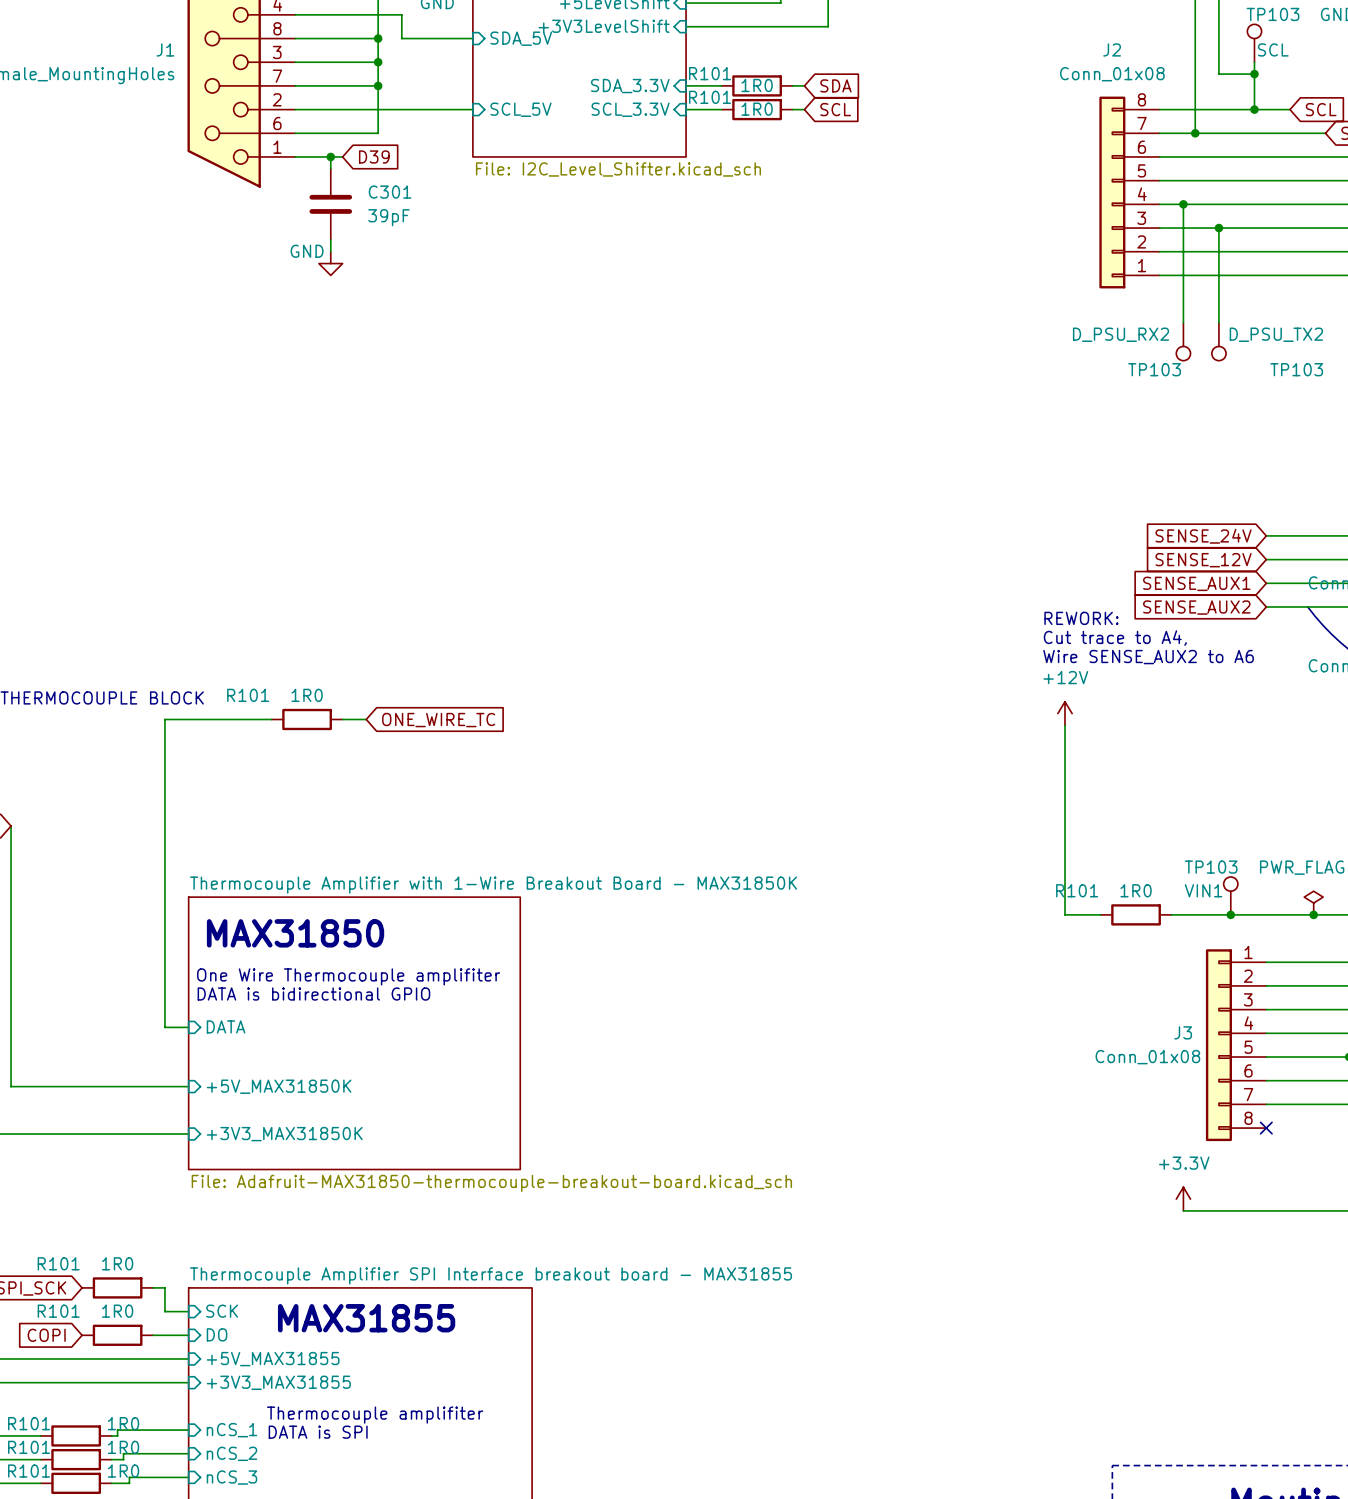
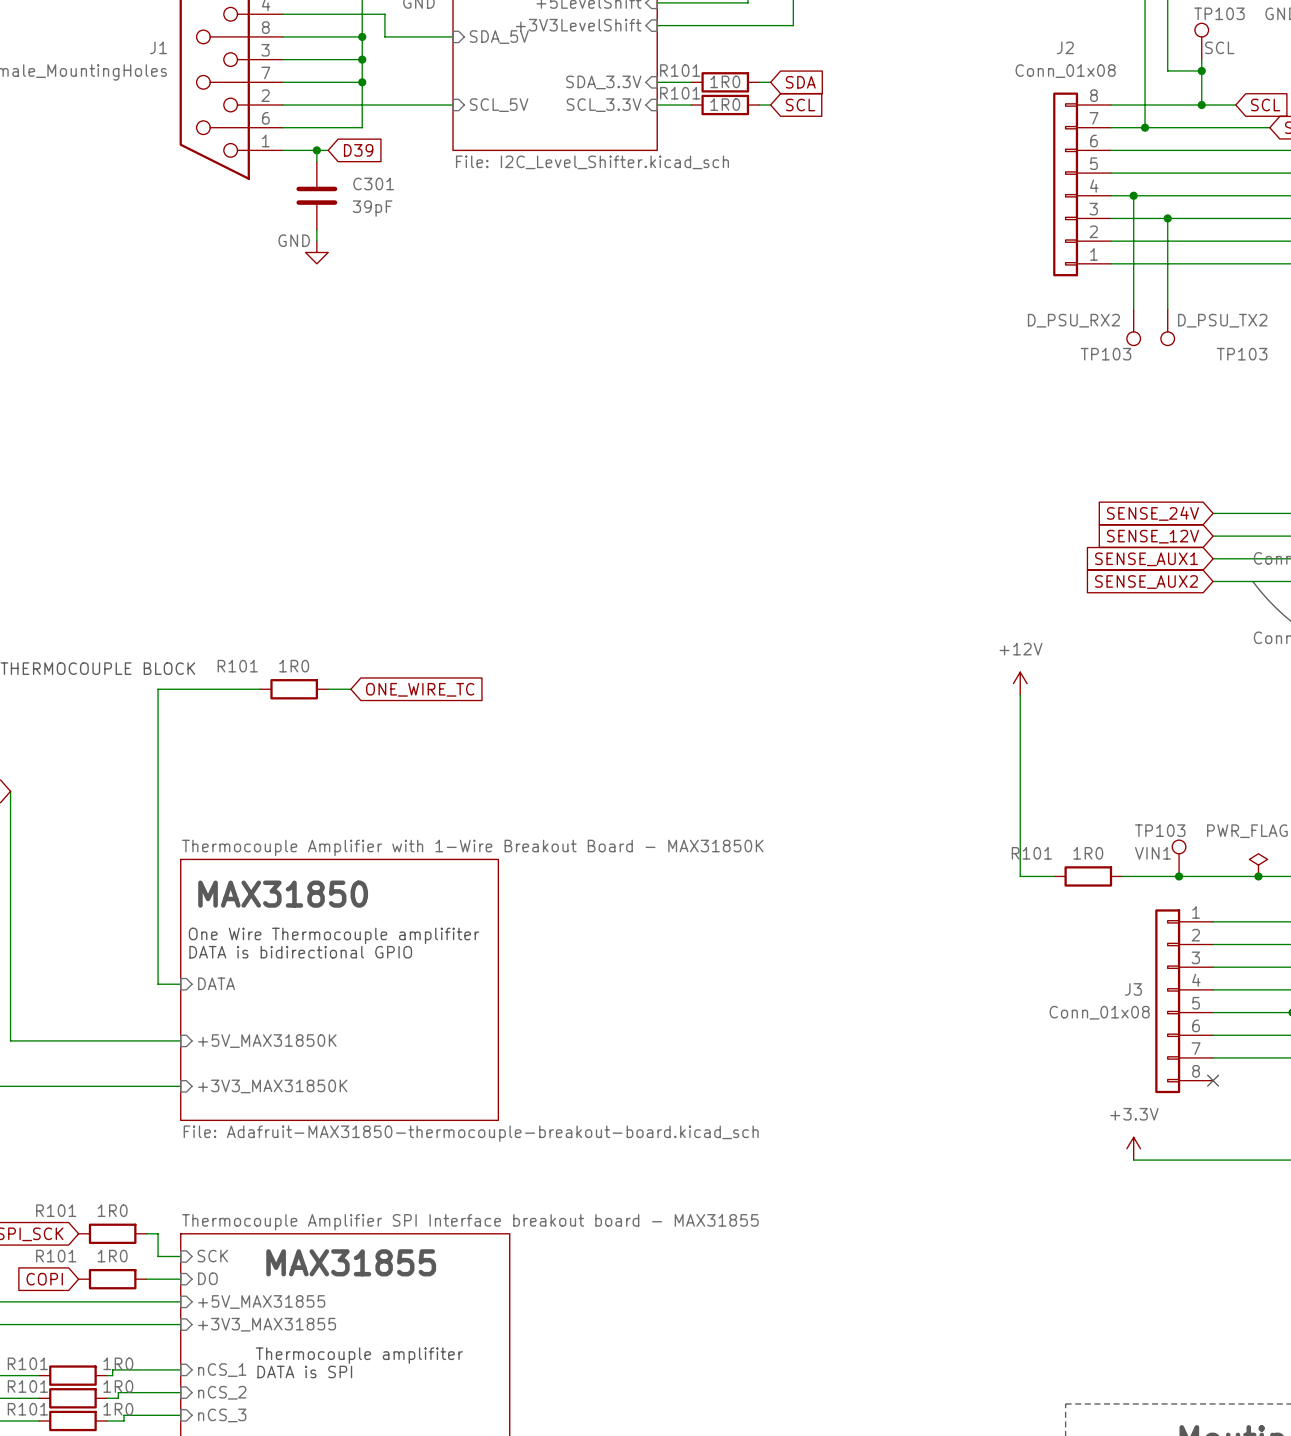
text: REWORK: (1081, 618) -> none
text: Cut trace to A4, (1115, 638) -> none
text: Wire SENSE_AUX2 to A6 (1148, 657) -> none

